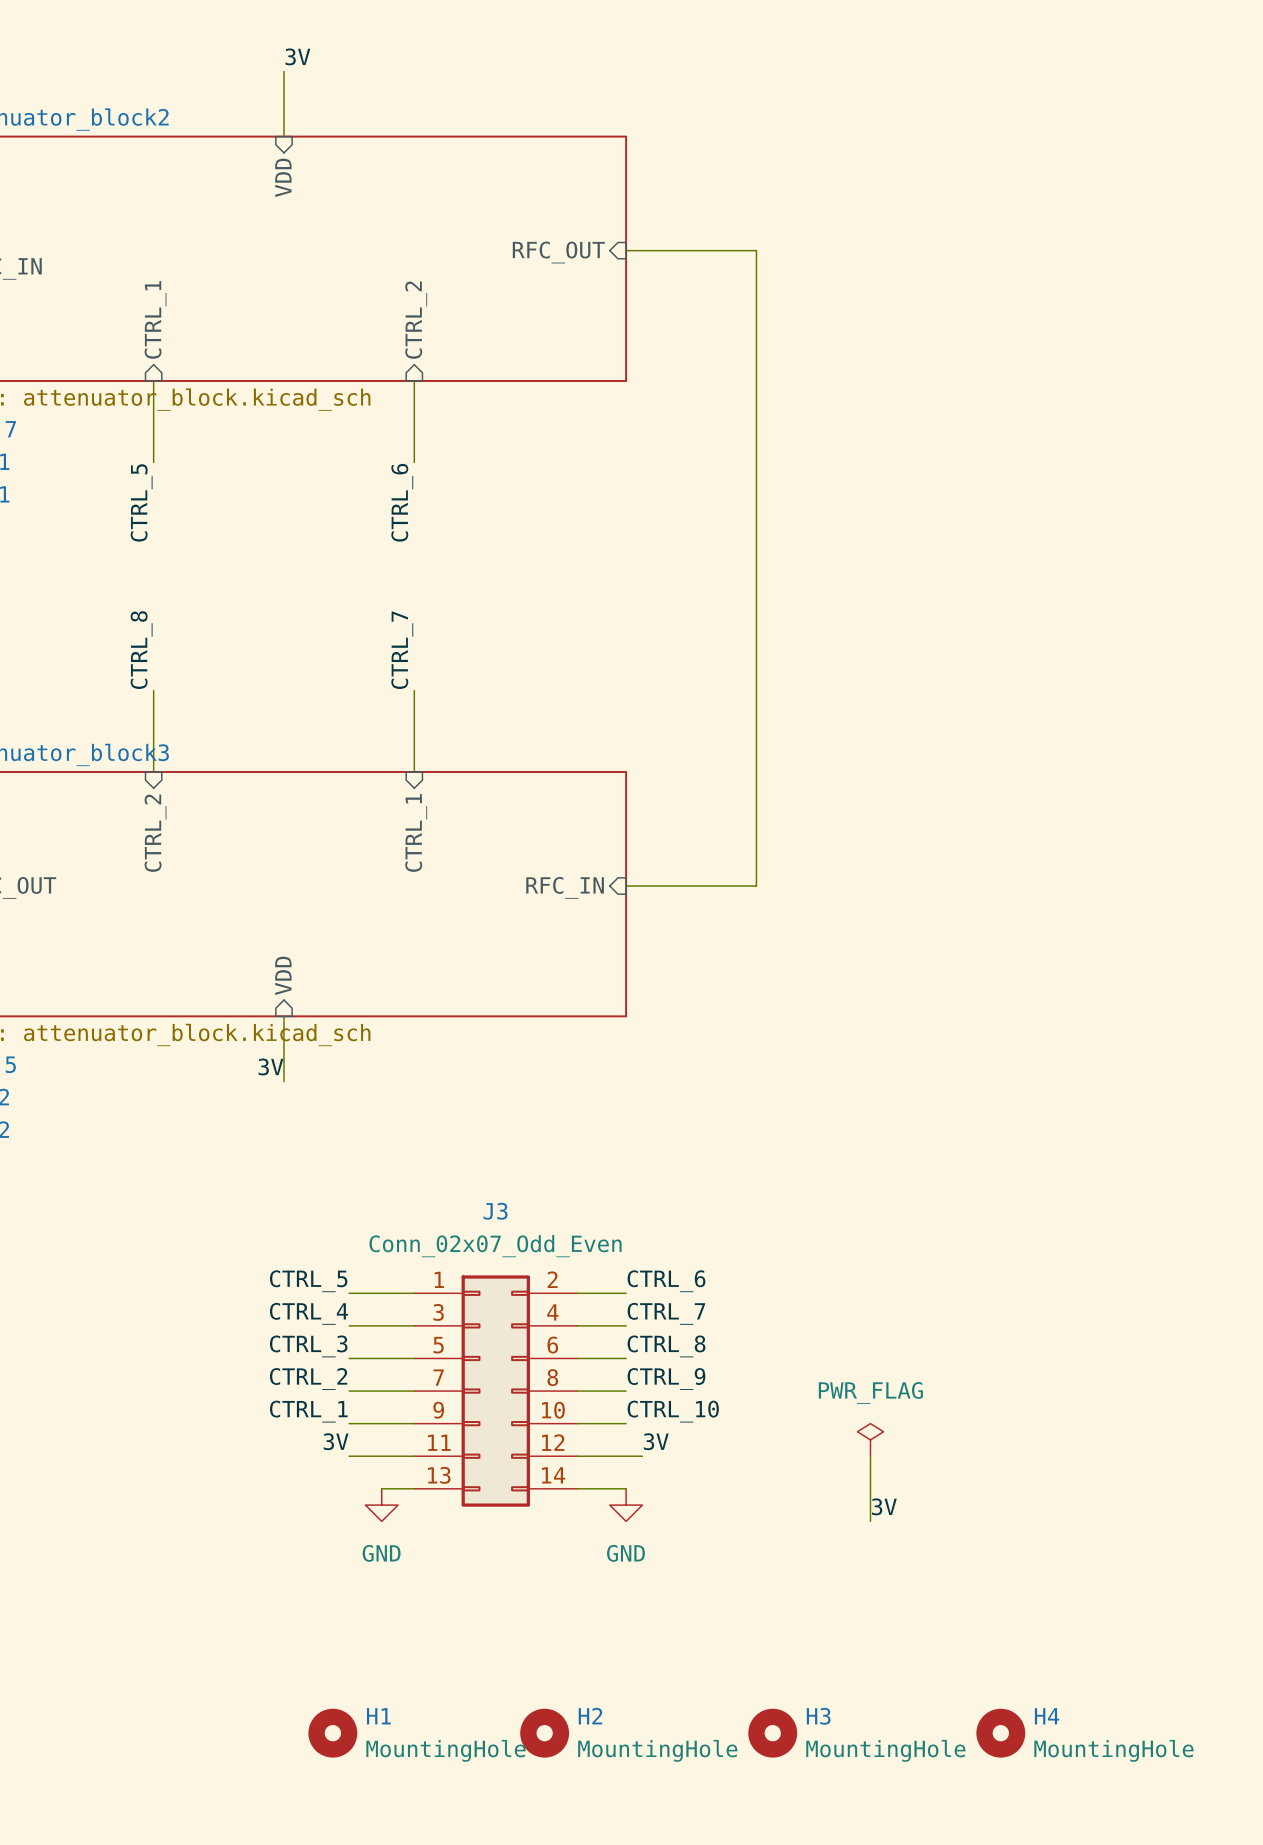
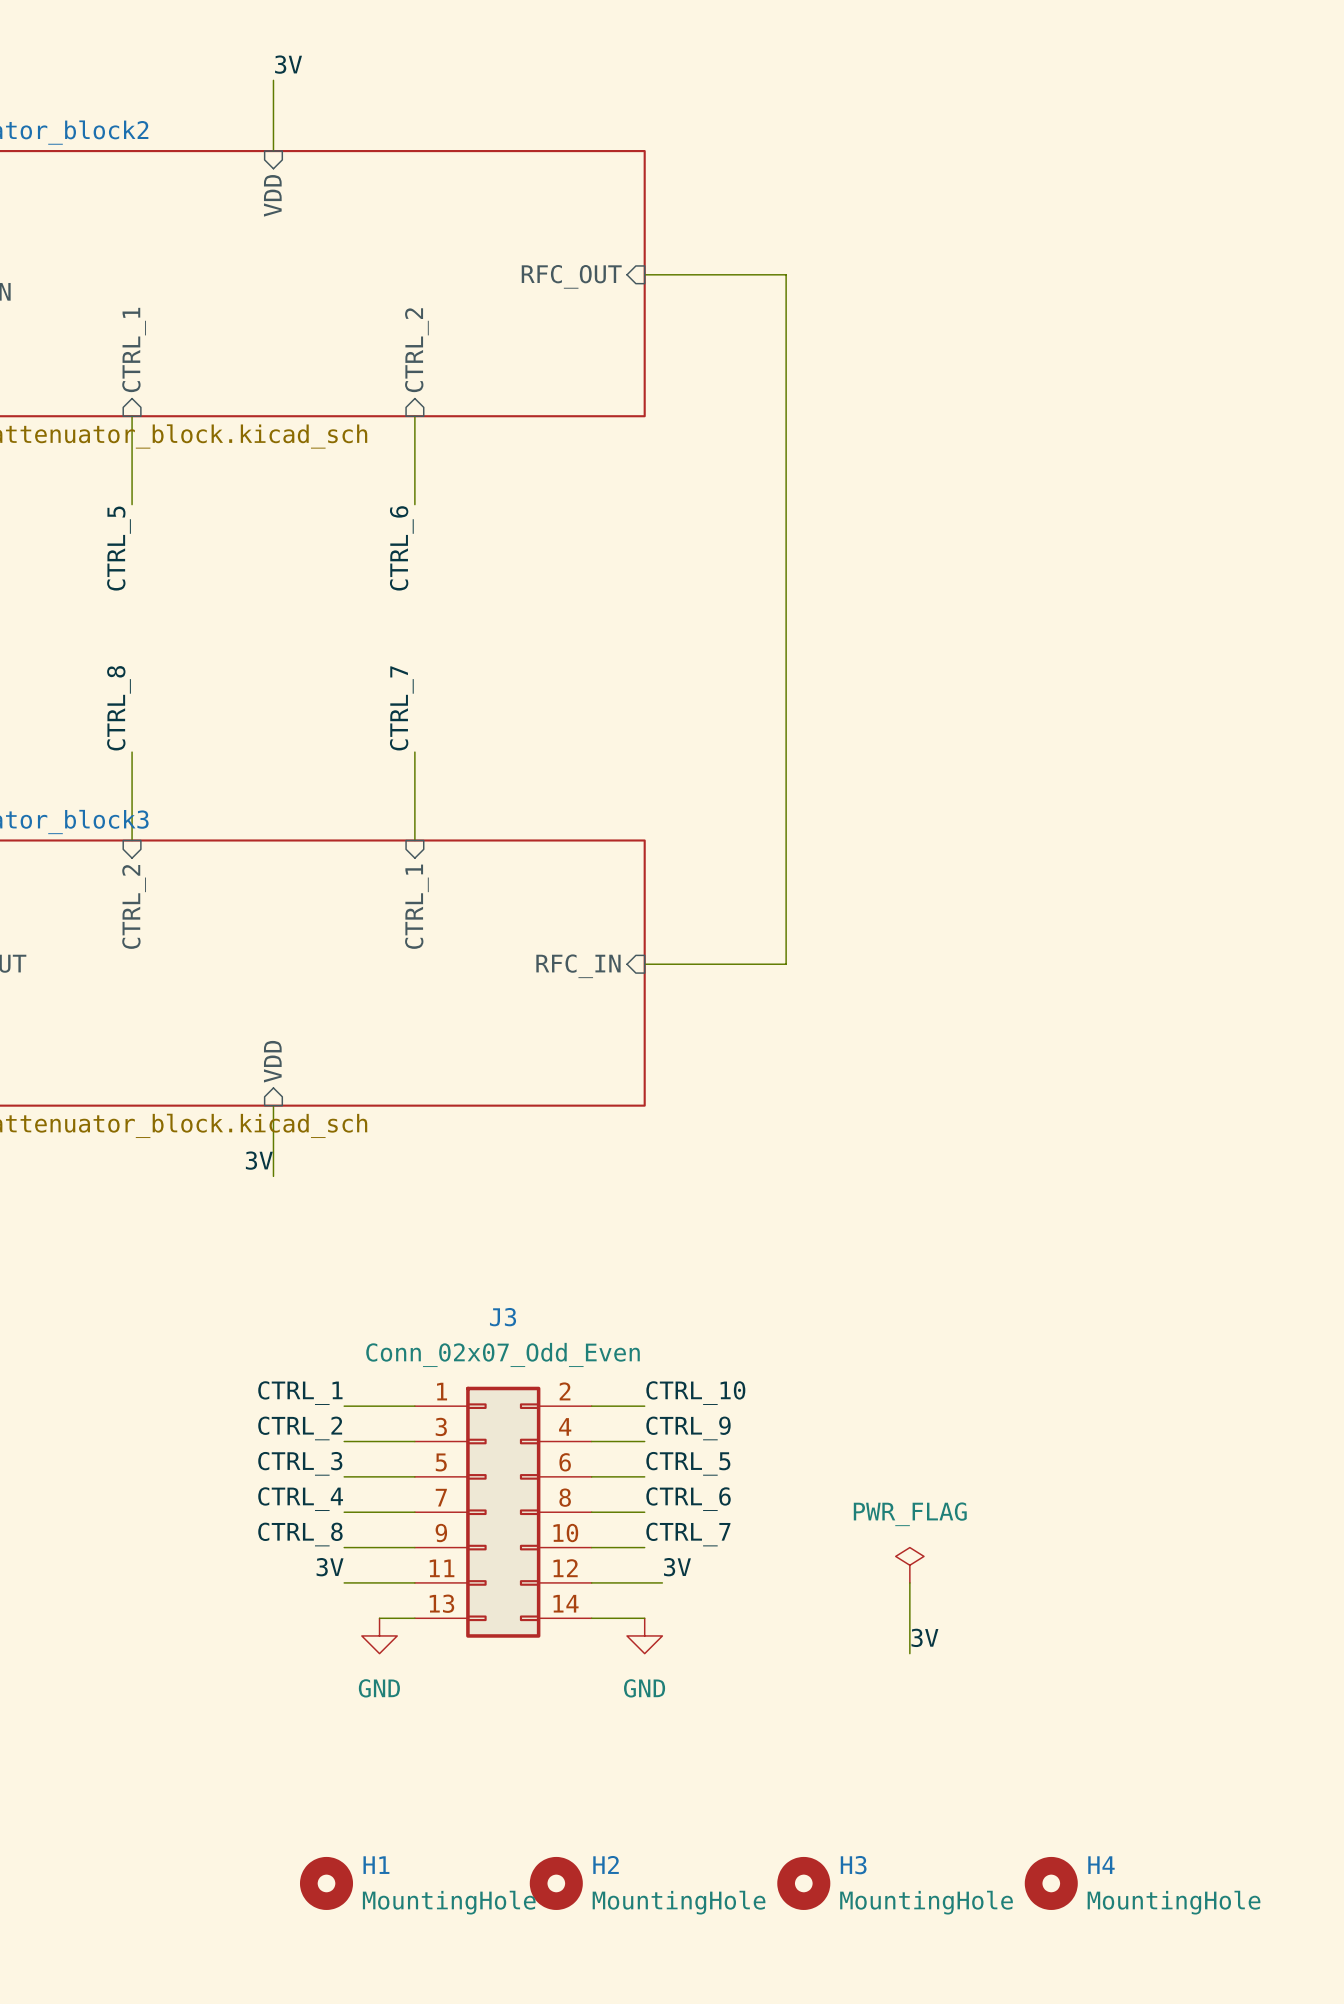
label: CTRL_5 (308, 1281) -> CTRL_1 (300, 1393)
label: CTRL_6 (666, 1281) -> CTRL_10 (695, 1393)
label: CTRL_4 (309, 1313) -> CTRL_2 (300, 1428)
label: CTRL_7 (666, 1313) -> CTRL_9 (688, 1428)
label: CTRL_8 (666, 1346) -> CTRL_5 (688, 1463)
label: CTRL_2 (308, 1379) -> CTRL_4 (300, 1499)
label: CTRL_9 (666, 1379) -> CTRL_6 (688, 1499)
label: CTRL_1 (308, 1411) -> CTRL_8 (300, 1534)
label: CTRL_10 (673, 1411) -> CTRL_7 (688, 1534)

